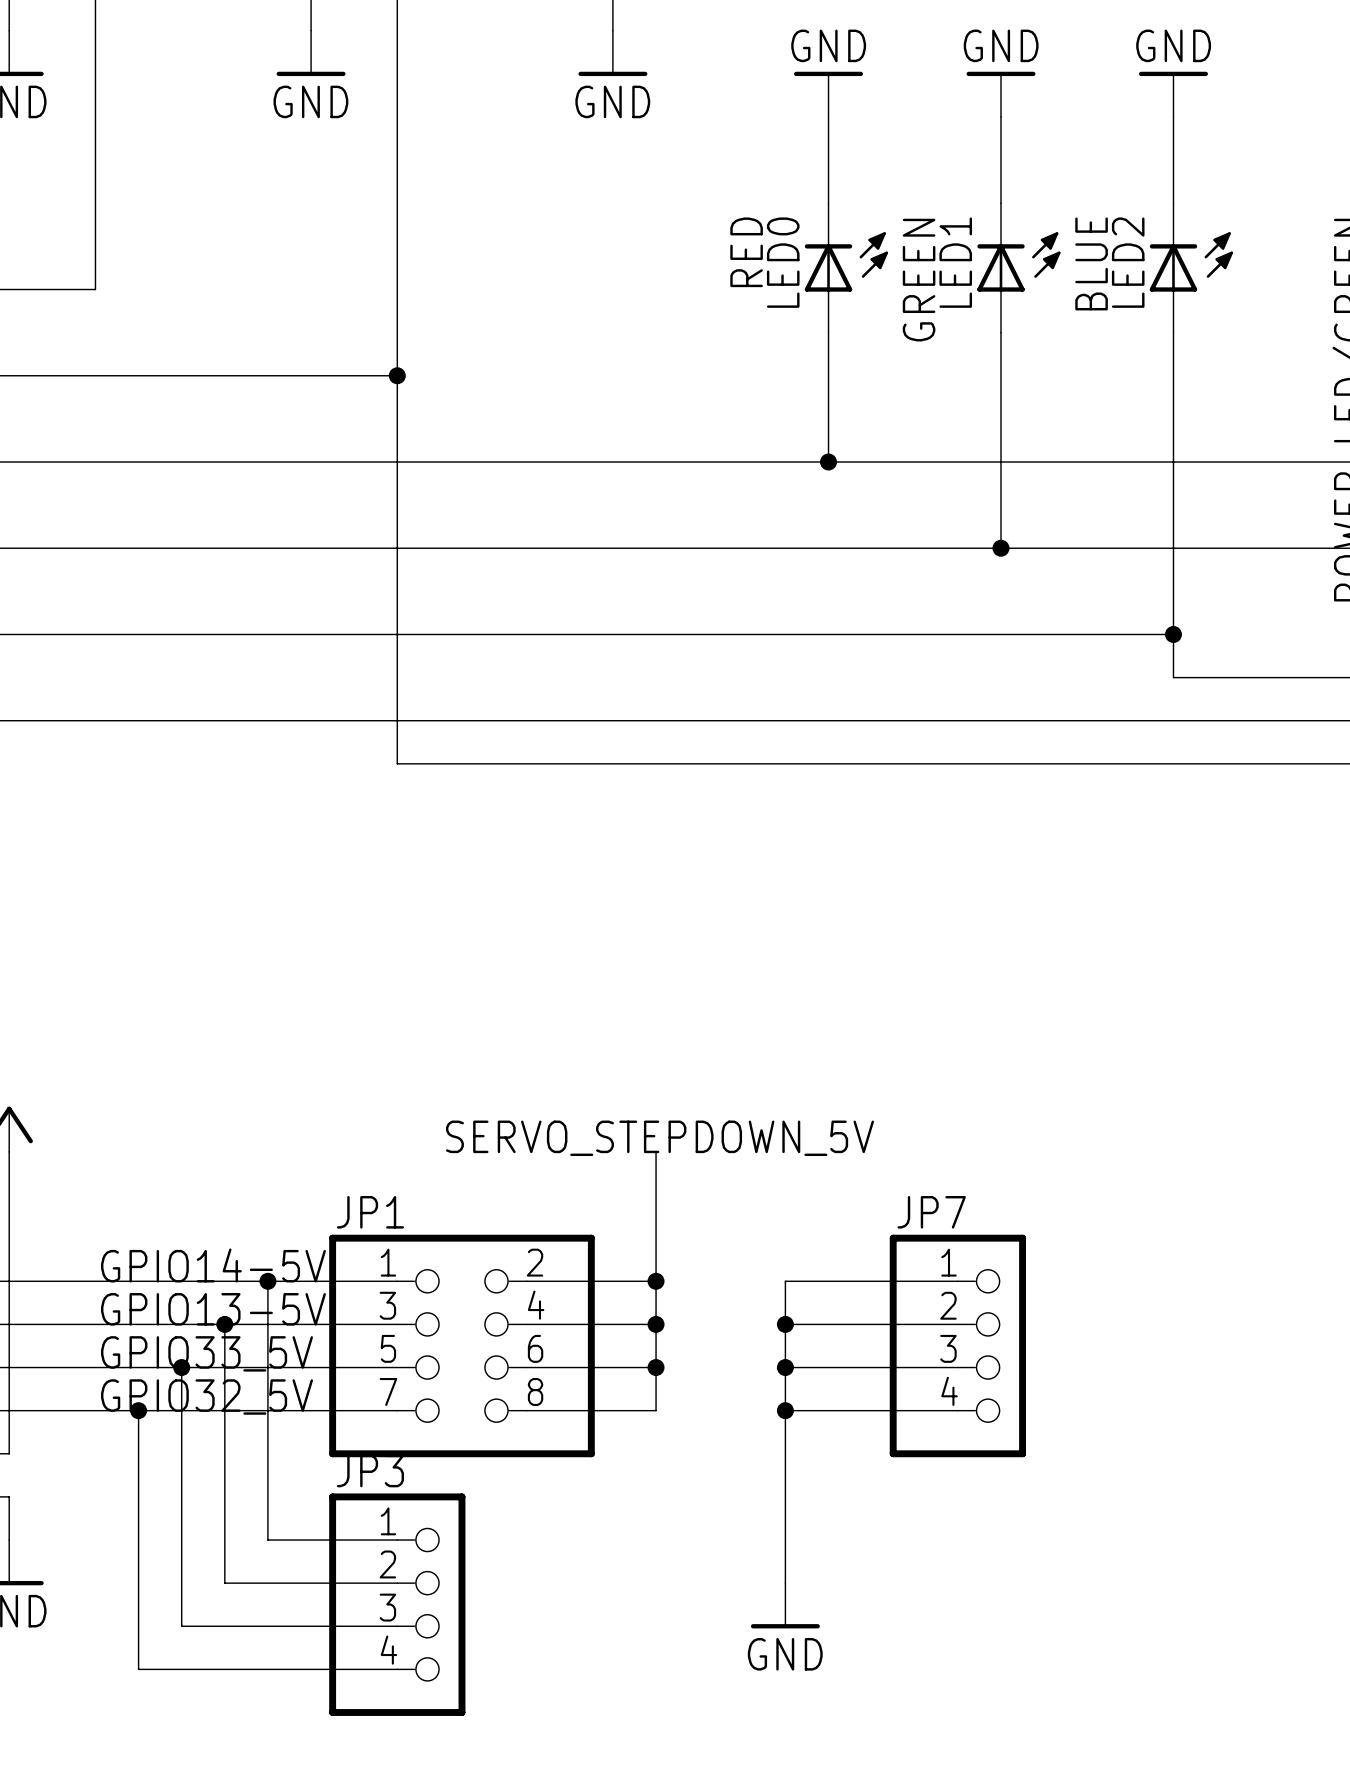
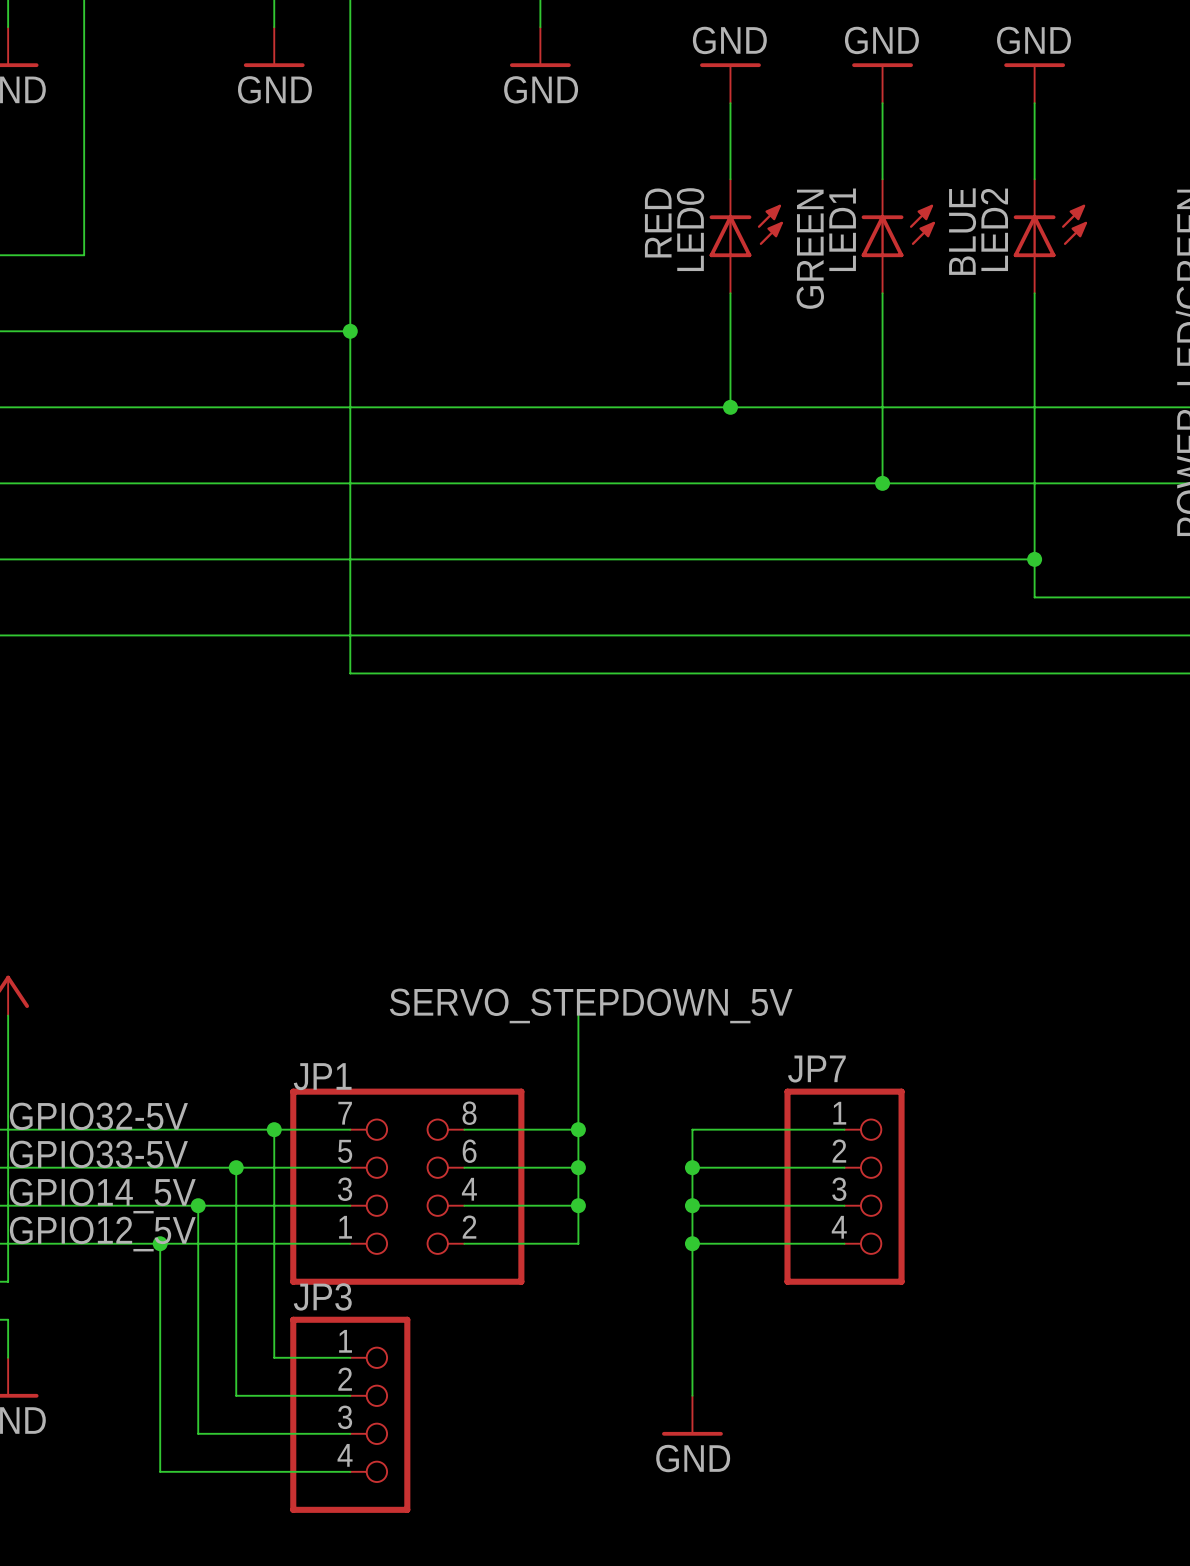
label: GPIO14-5V (213, 1265) -> none
label: none -> GPIO32-5V (98, 1116)
wire: (267, 1281) (267, 1324) -> none
junction: (267, 1281) -> none
wire: none -> (274, 1129) (274, 1357)
junction: none -> (274, 1129)
label: none -> GPIO33-5V (98, 1154)
label: GPIO13-5V (213, 1309) -> none
wire: (224, 1324) (224, 1367) -> none
junction: (224, 1324) -> none
junction: none -> (236, 1167)
JP1 flip: as is (461, 1345) -> up-down (407, 1186)
label: none -> GPIO14_5V (102, 1196)
label: GPIO33_5V (207, 1353) -> none
wire: (181, 1367) (181, 1410) -> none
junction: (181, 1367) -> none
junction: none -> (198, 1205)
label: none -> GPIO12_5V (102, 1234)
label: GPIO32_5V (207, 1397) -> none
wire: (138, 1410) (138, 1669) (181, 1669) -> (160, 1433) (160, 1471)
junction: (138, 1410) -> none
junction: none -> (160, 1243)
wire: (267, 1540) (311, 1540) -> (236, 1357) (236, 1395)
wire: (224, 1583) (267, 1583) -> none
wire: (181, 1626) (224, 1626) -> (198, 1395) (198, 1433)

